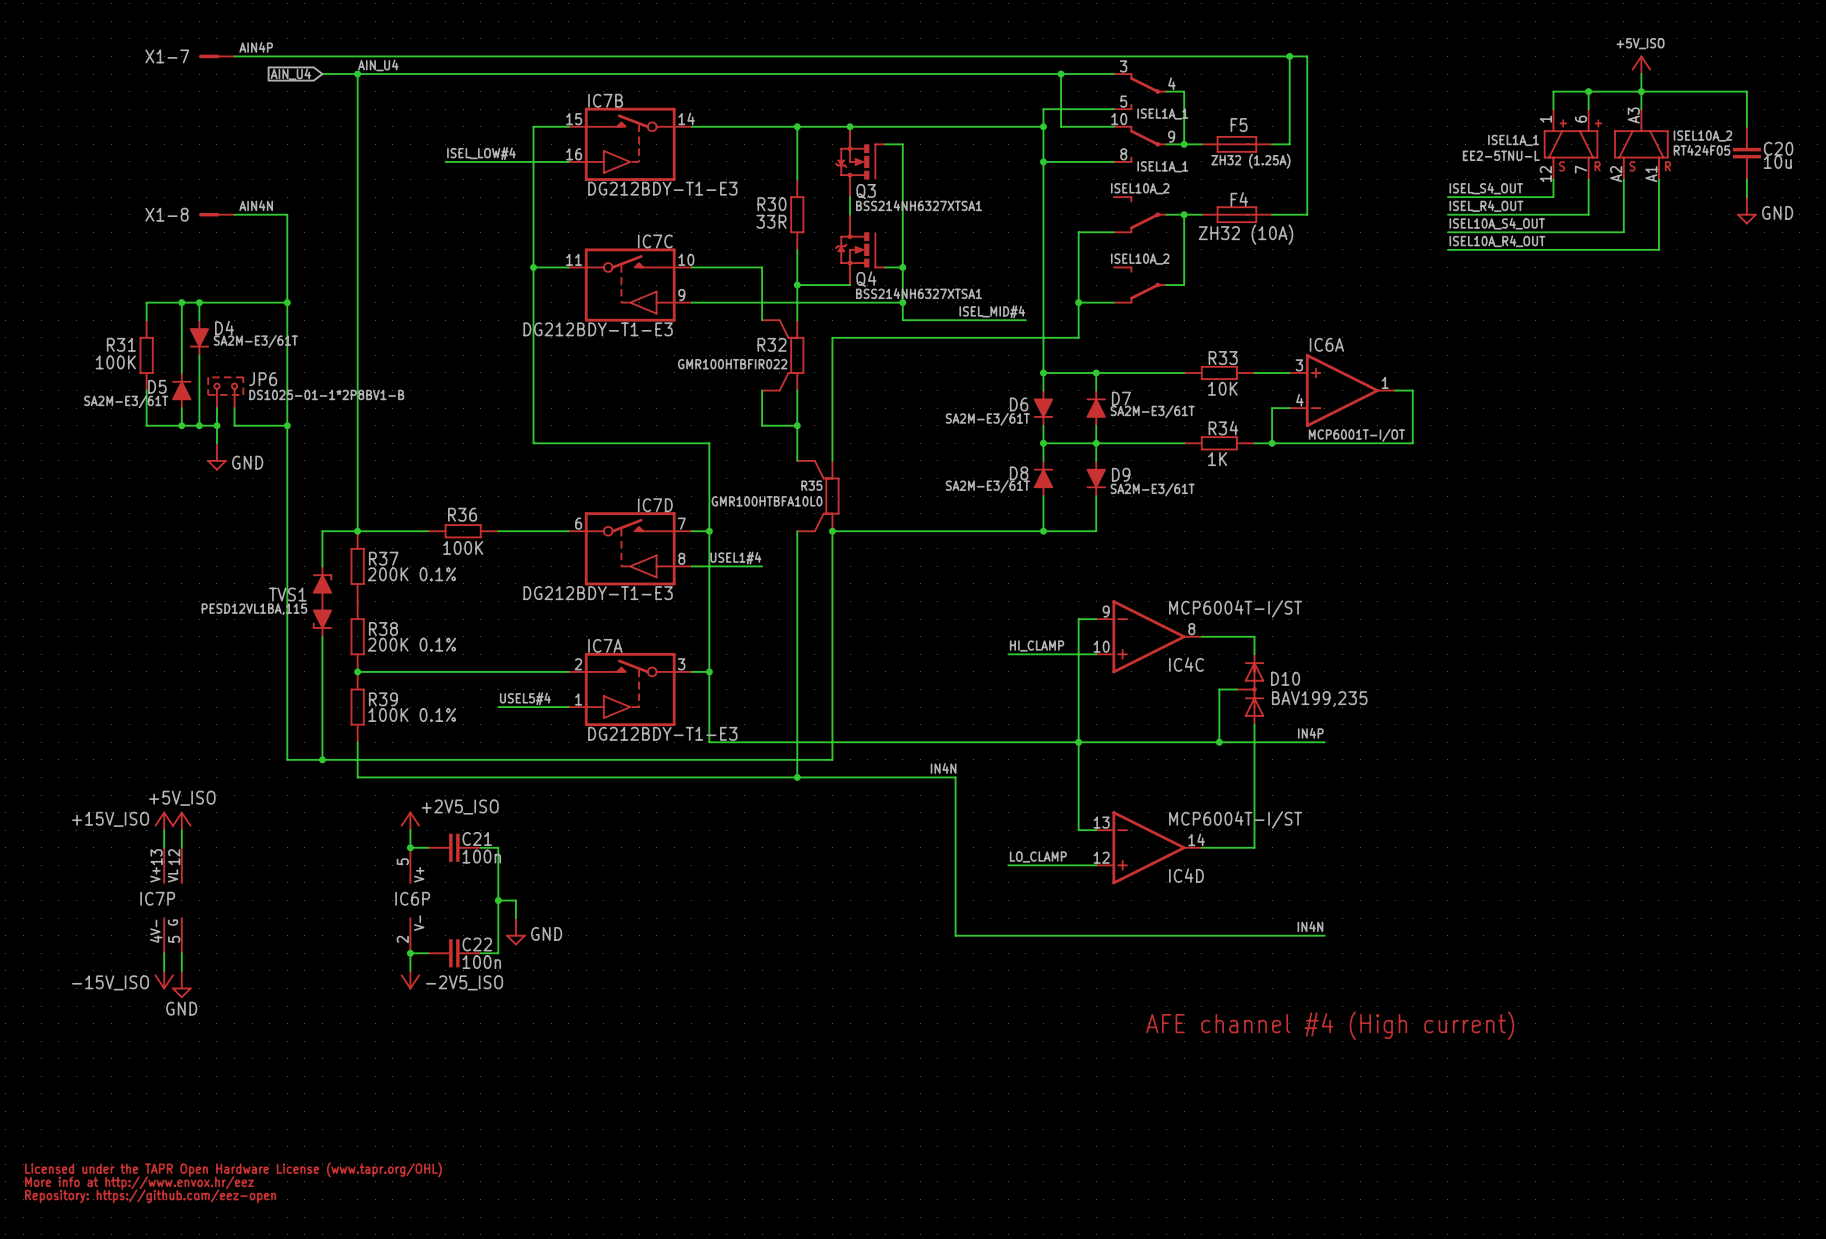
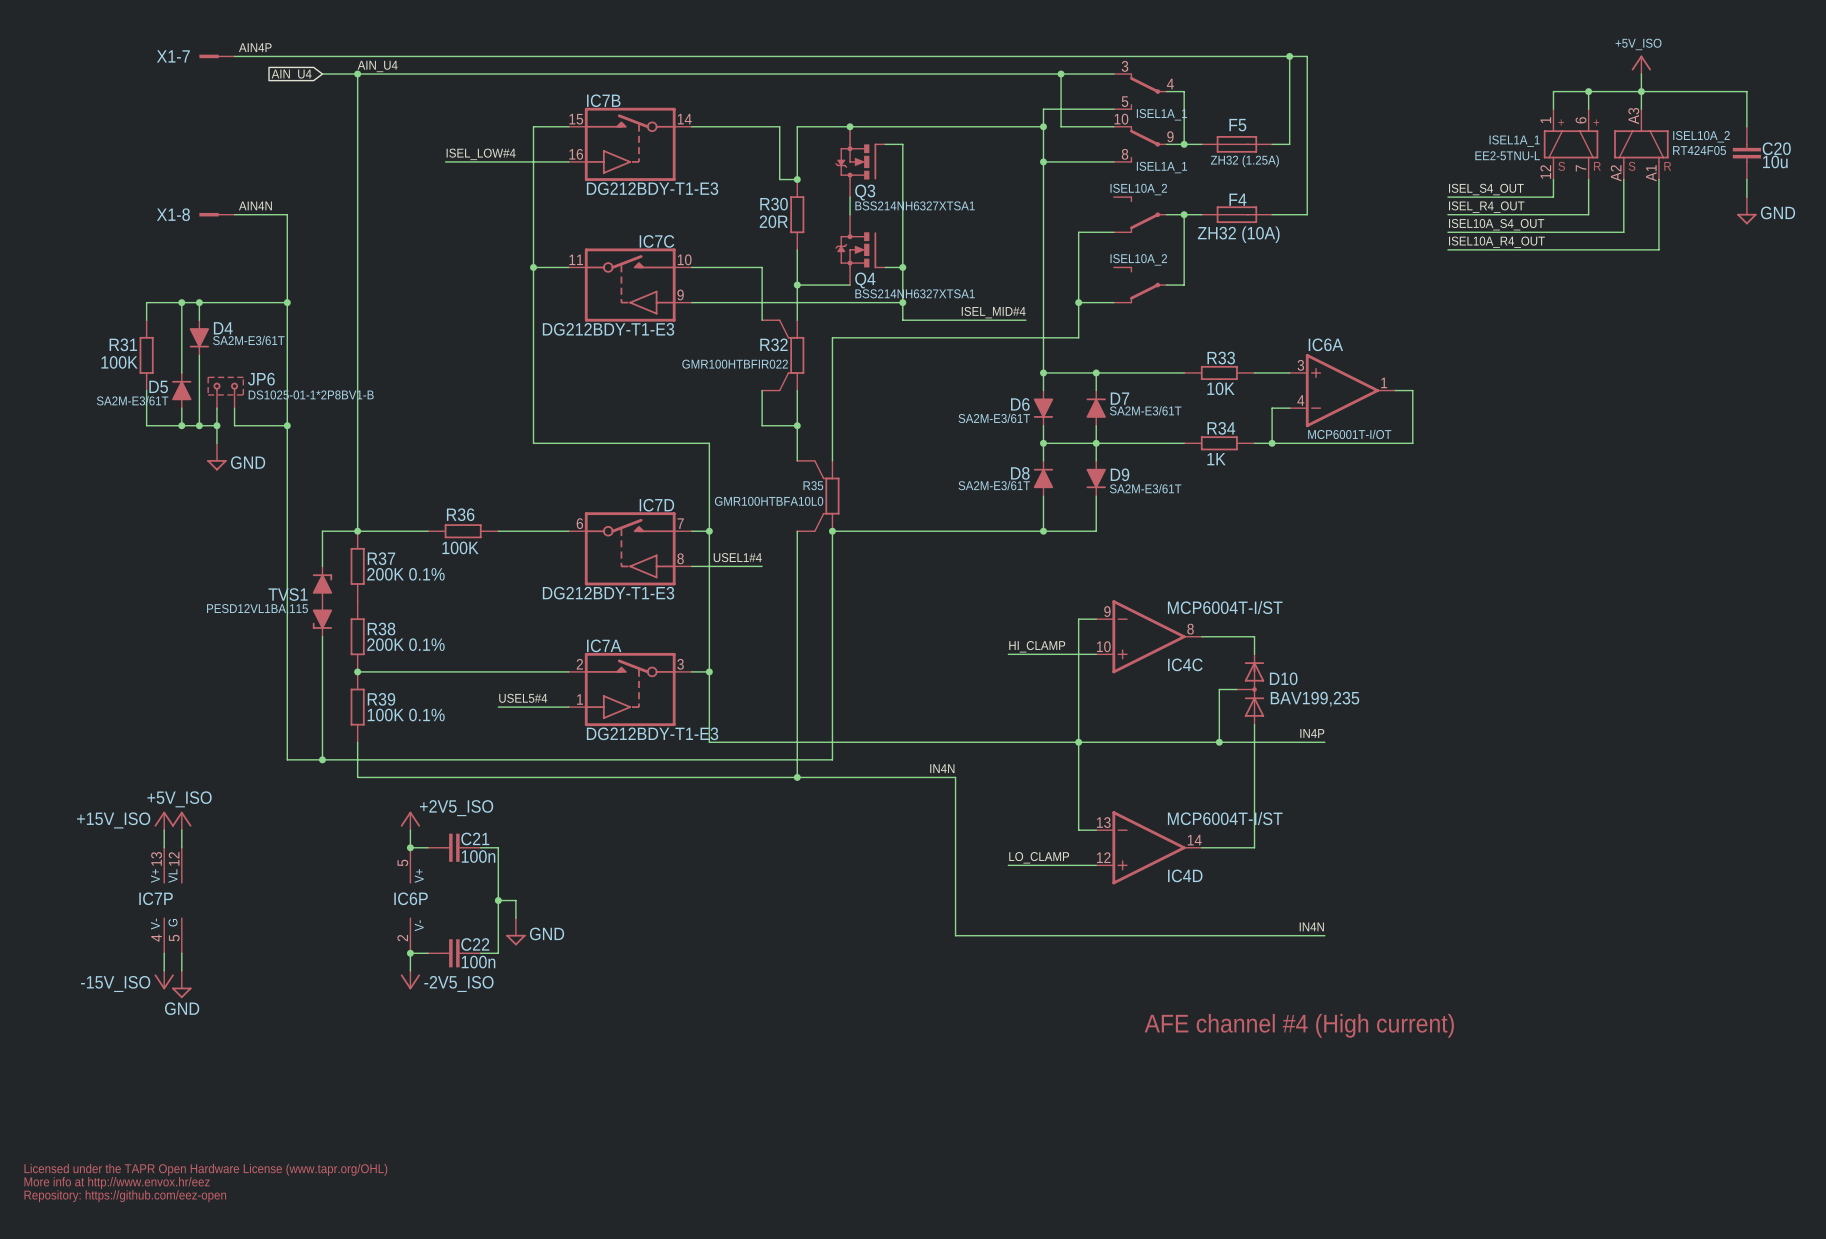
wire: (779, 126) (797, 126) -> (779, 126) (779, 179) (797, 179)
junction: (797, 126) -> none
junction: none -> (797, 179)
R30 value: 33R (771, 221) -> 20R (773, 221)

